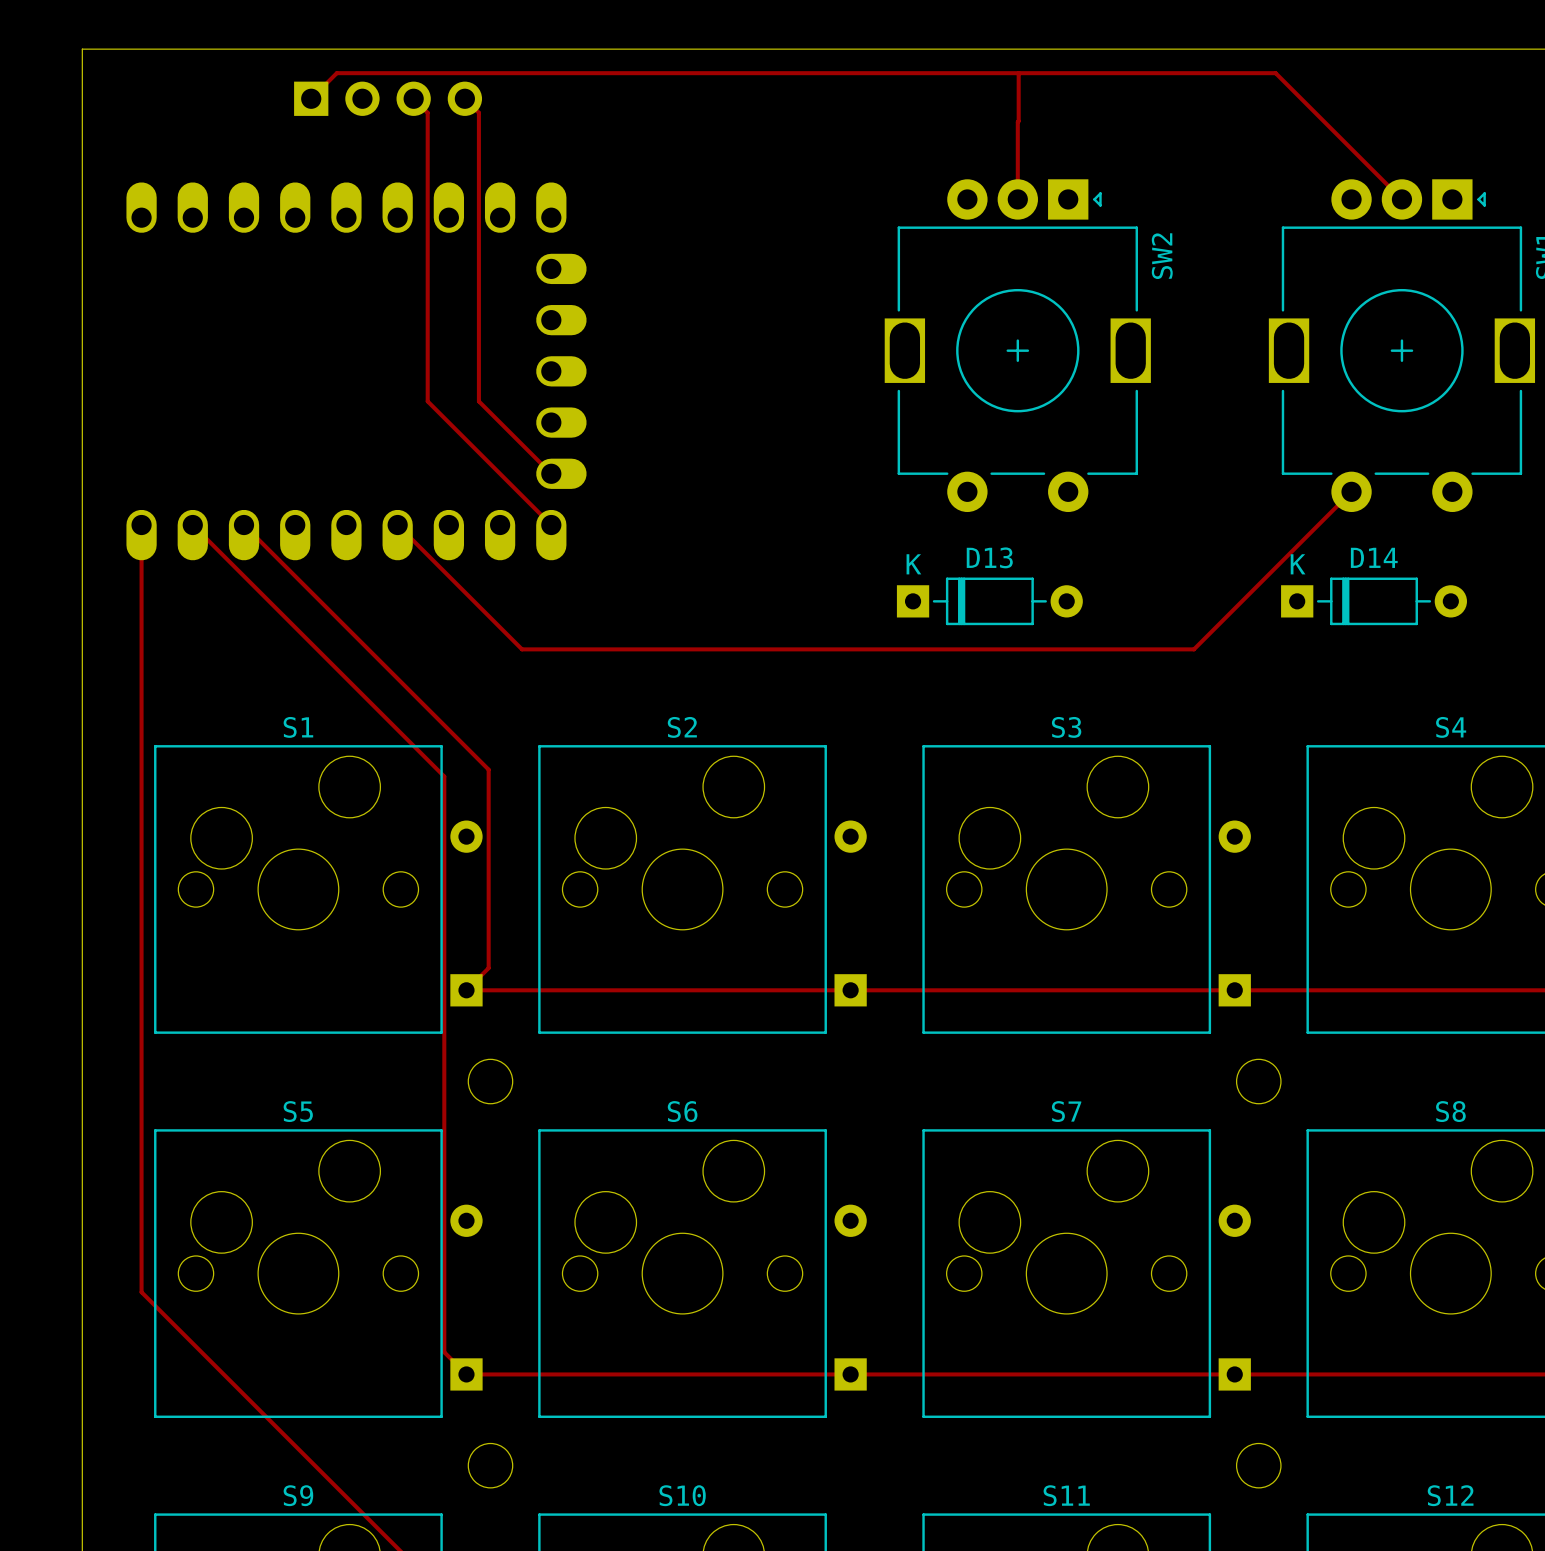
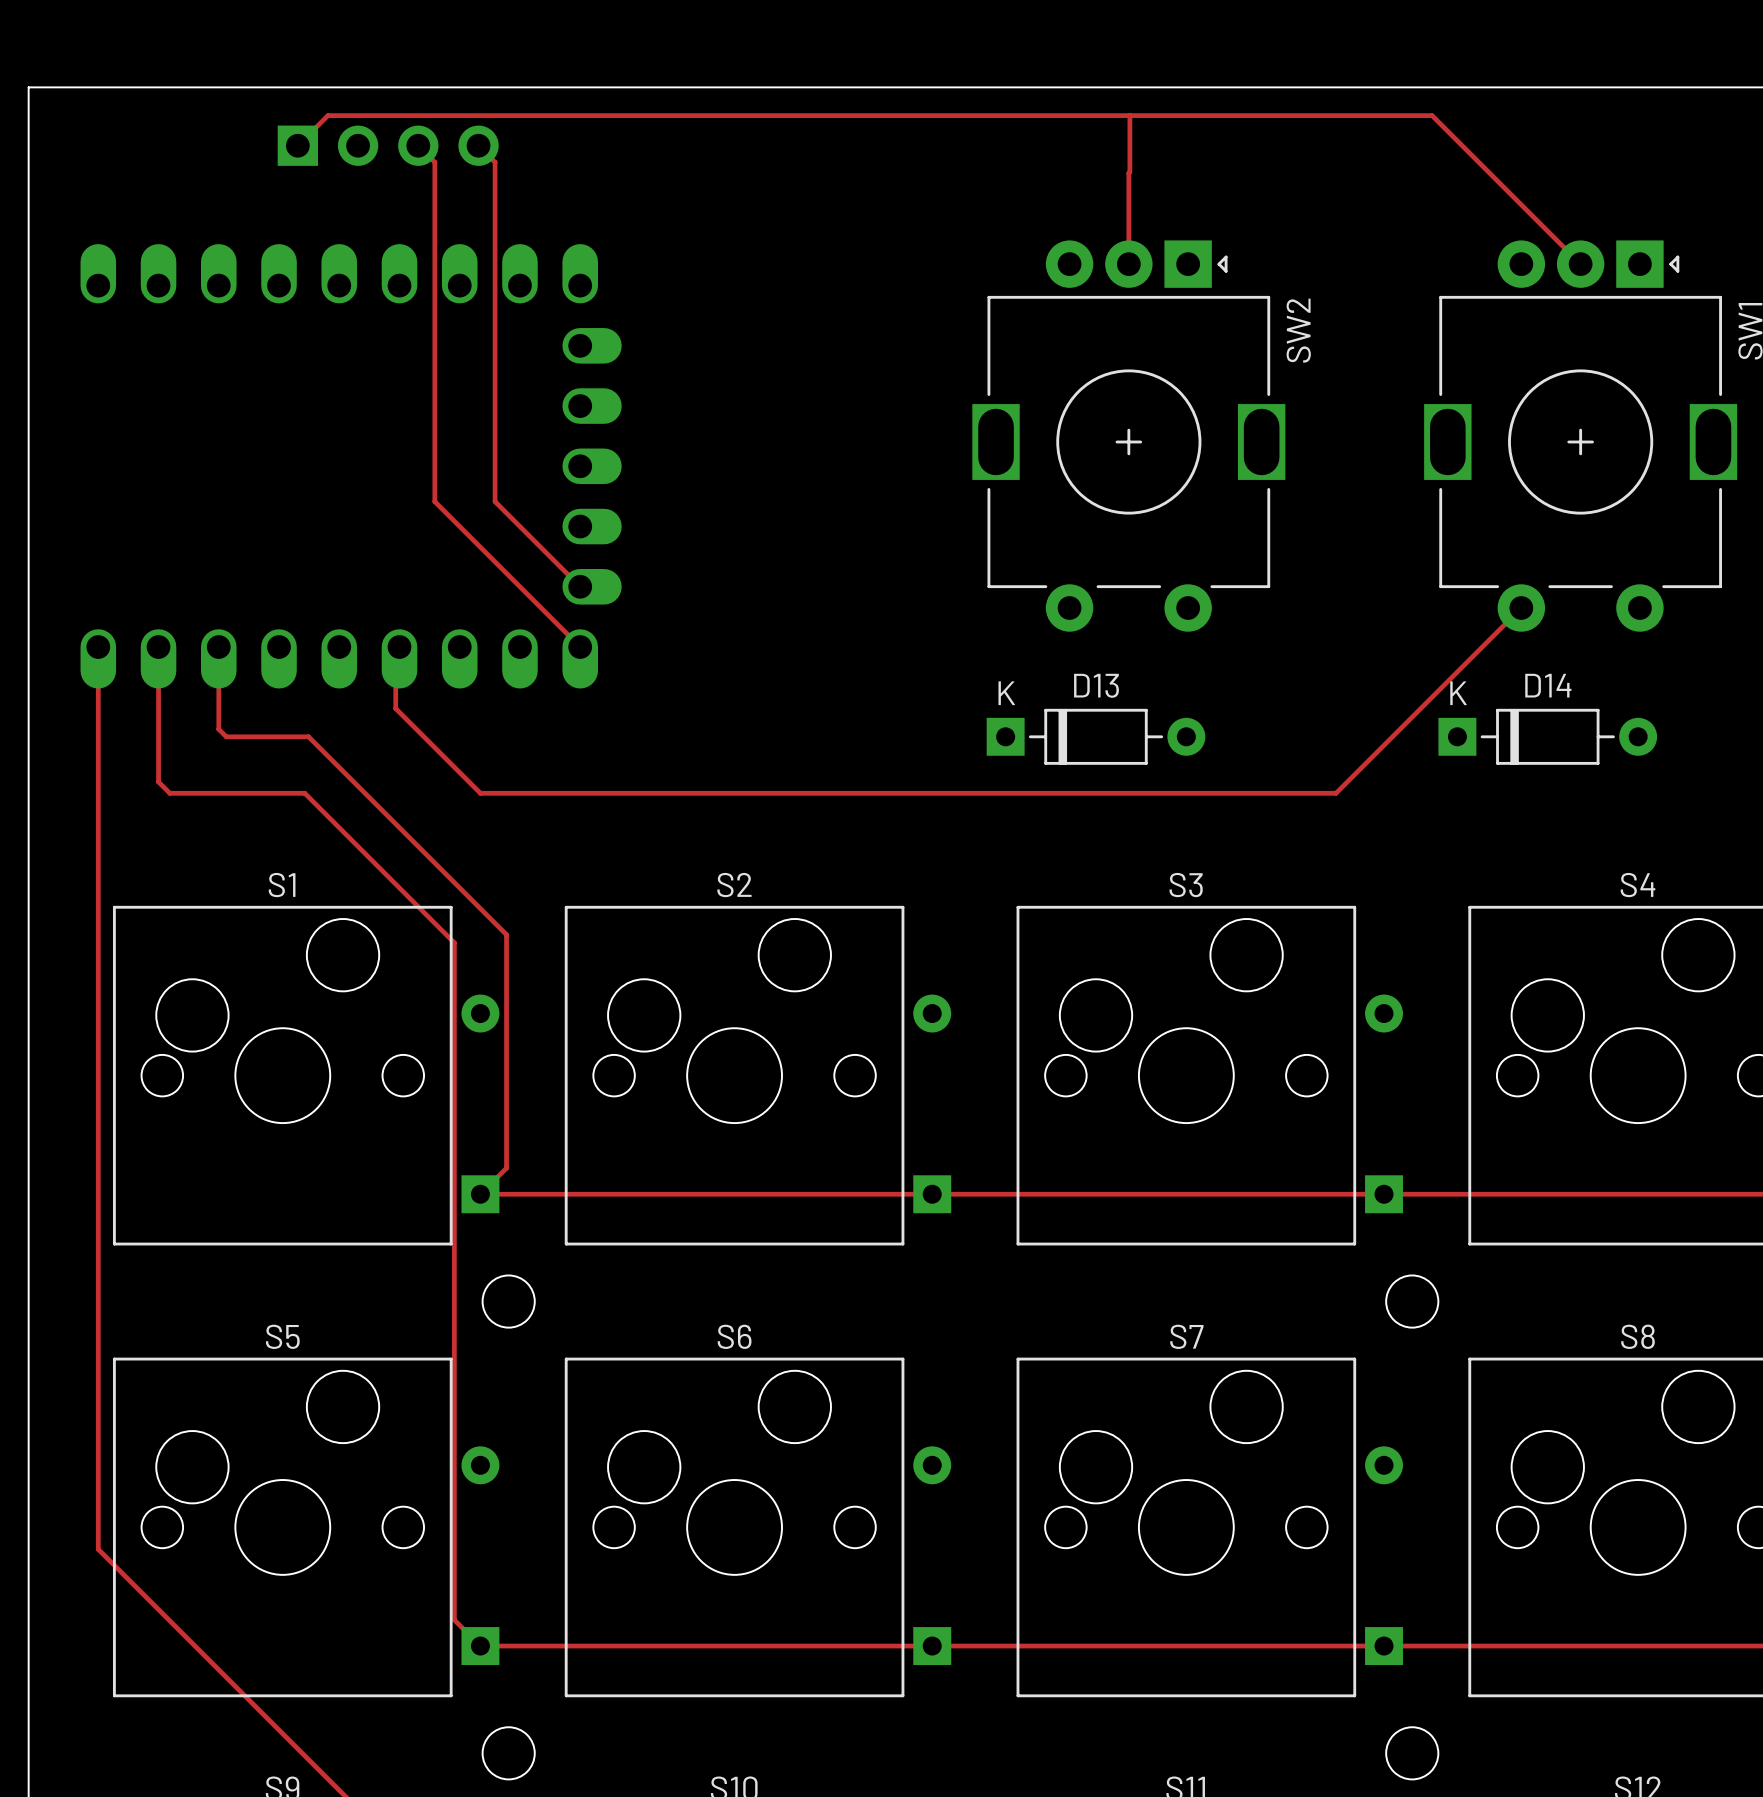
track: (192, 525) (317, 649) -> (158, 647) (158, 781) (169, 793) (304, 793)
track: (244, 525) (320, 601) -> (218, 647) (218, 729) (226, 736) (308, 736)
track: (397, 525) (522, 649) -> (399, 647) (395, 650) (395, 708) (480, 793) (545, 793)

